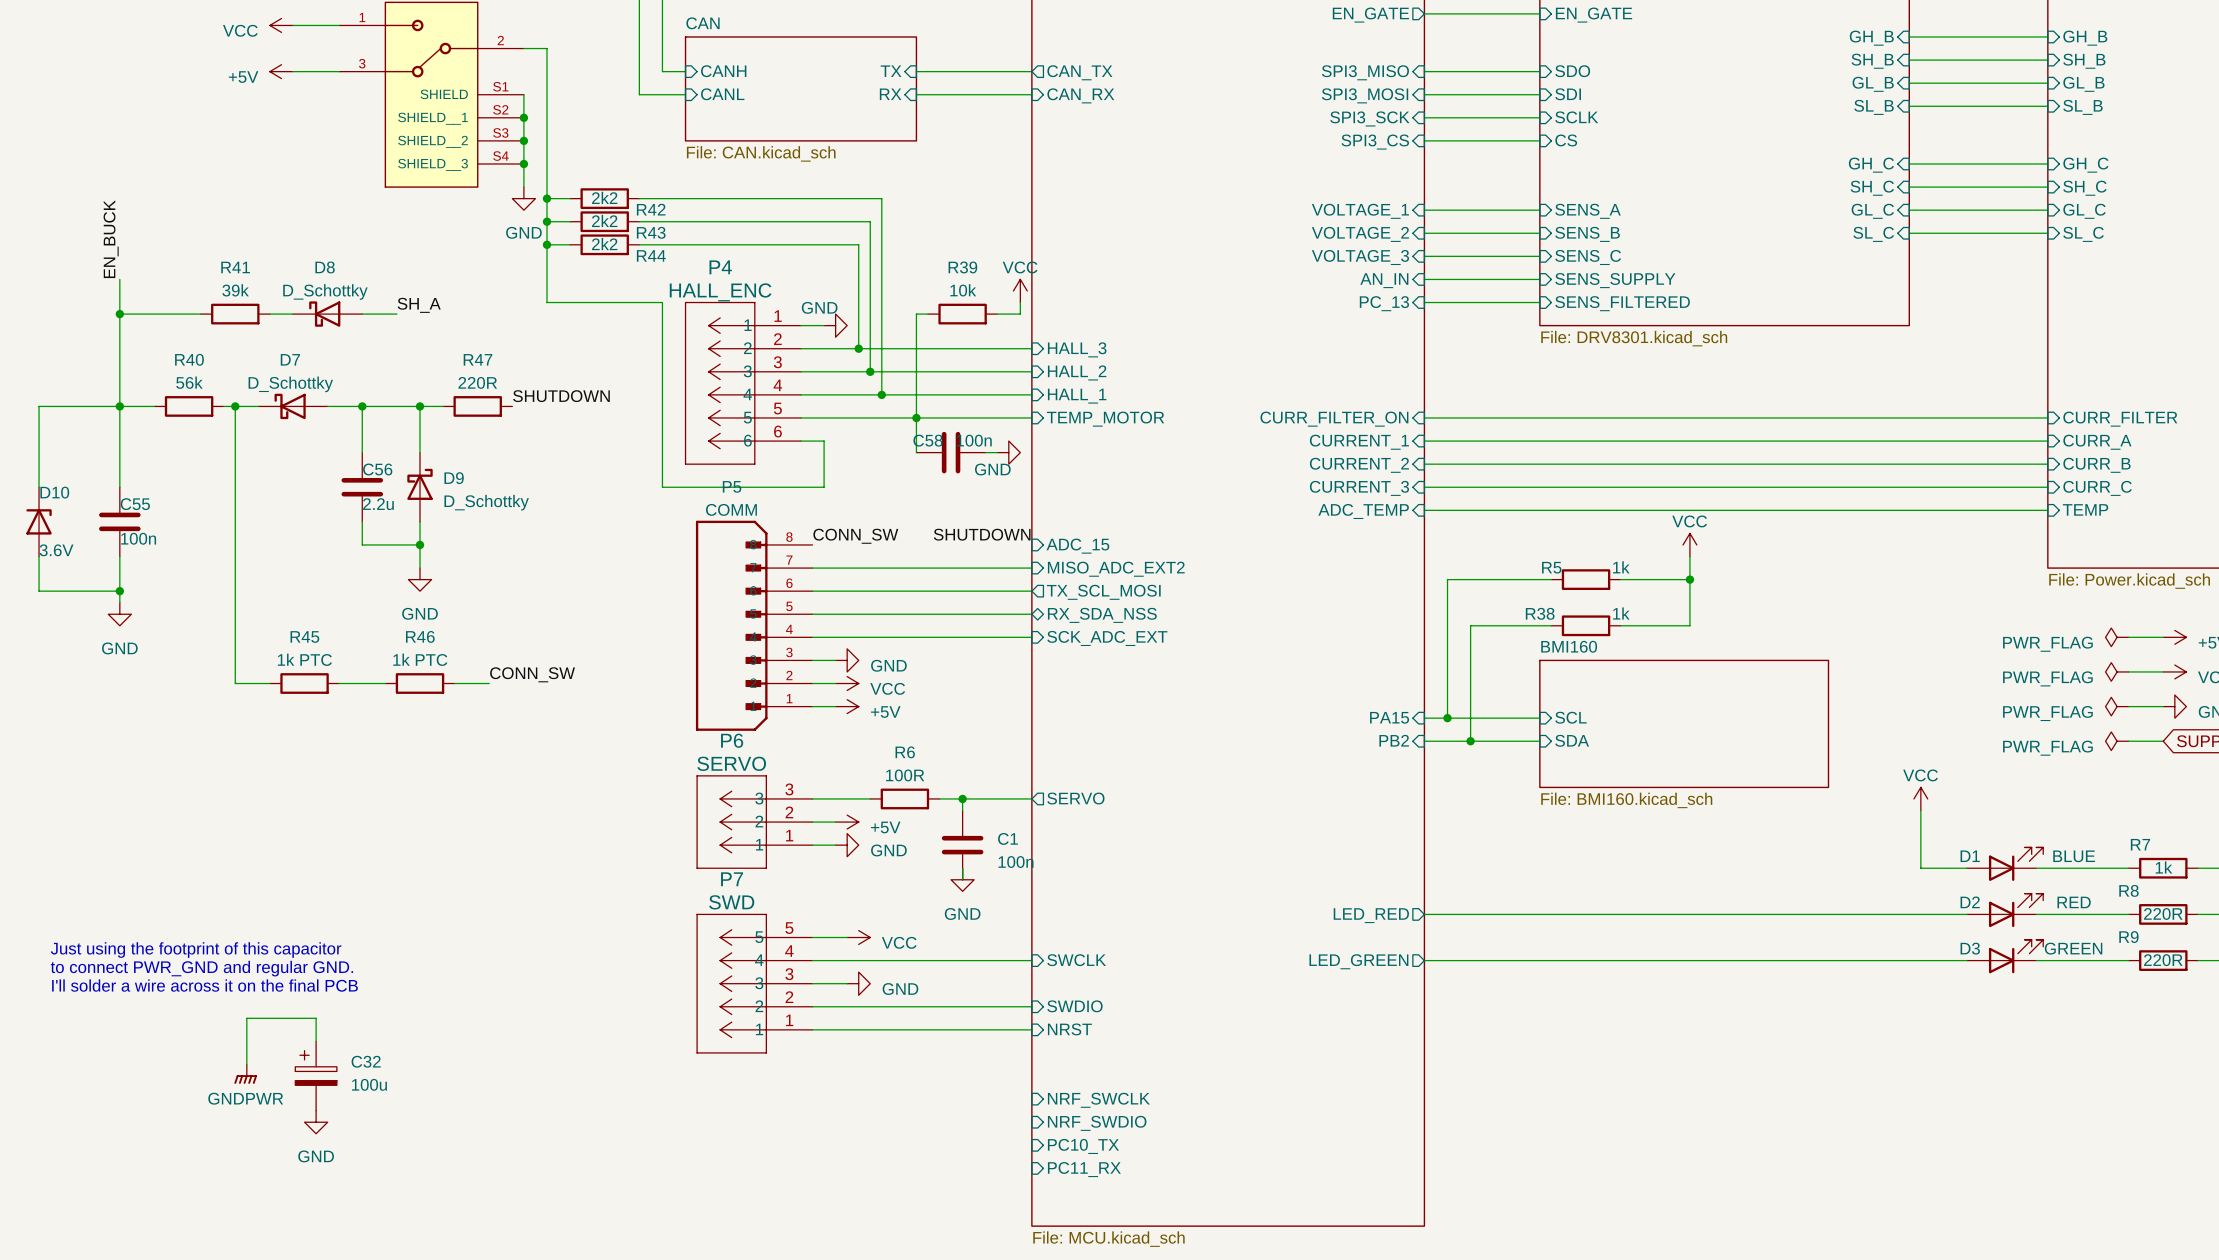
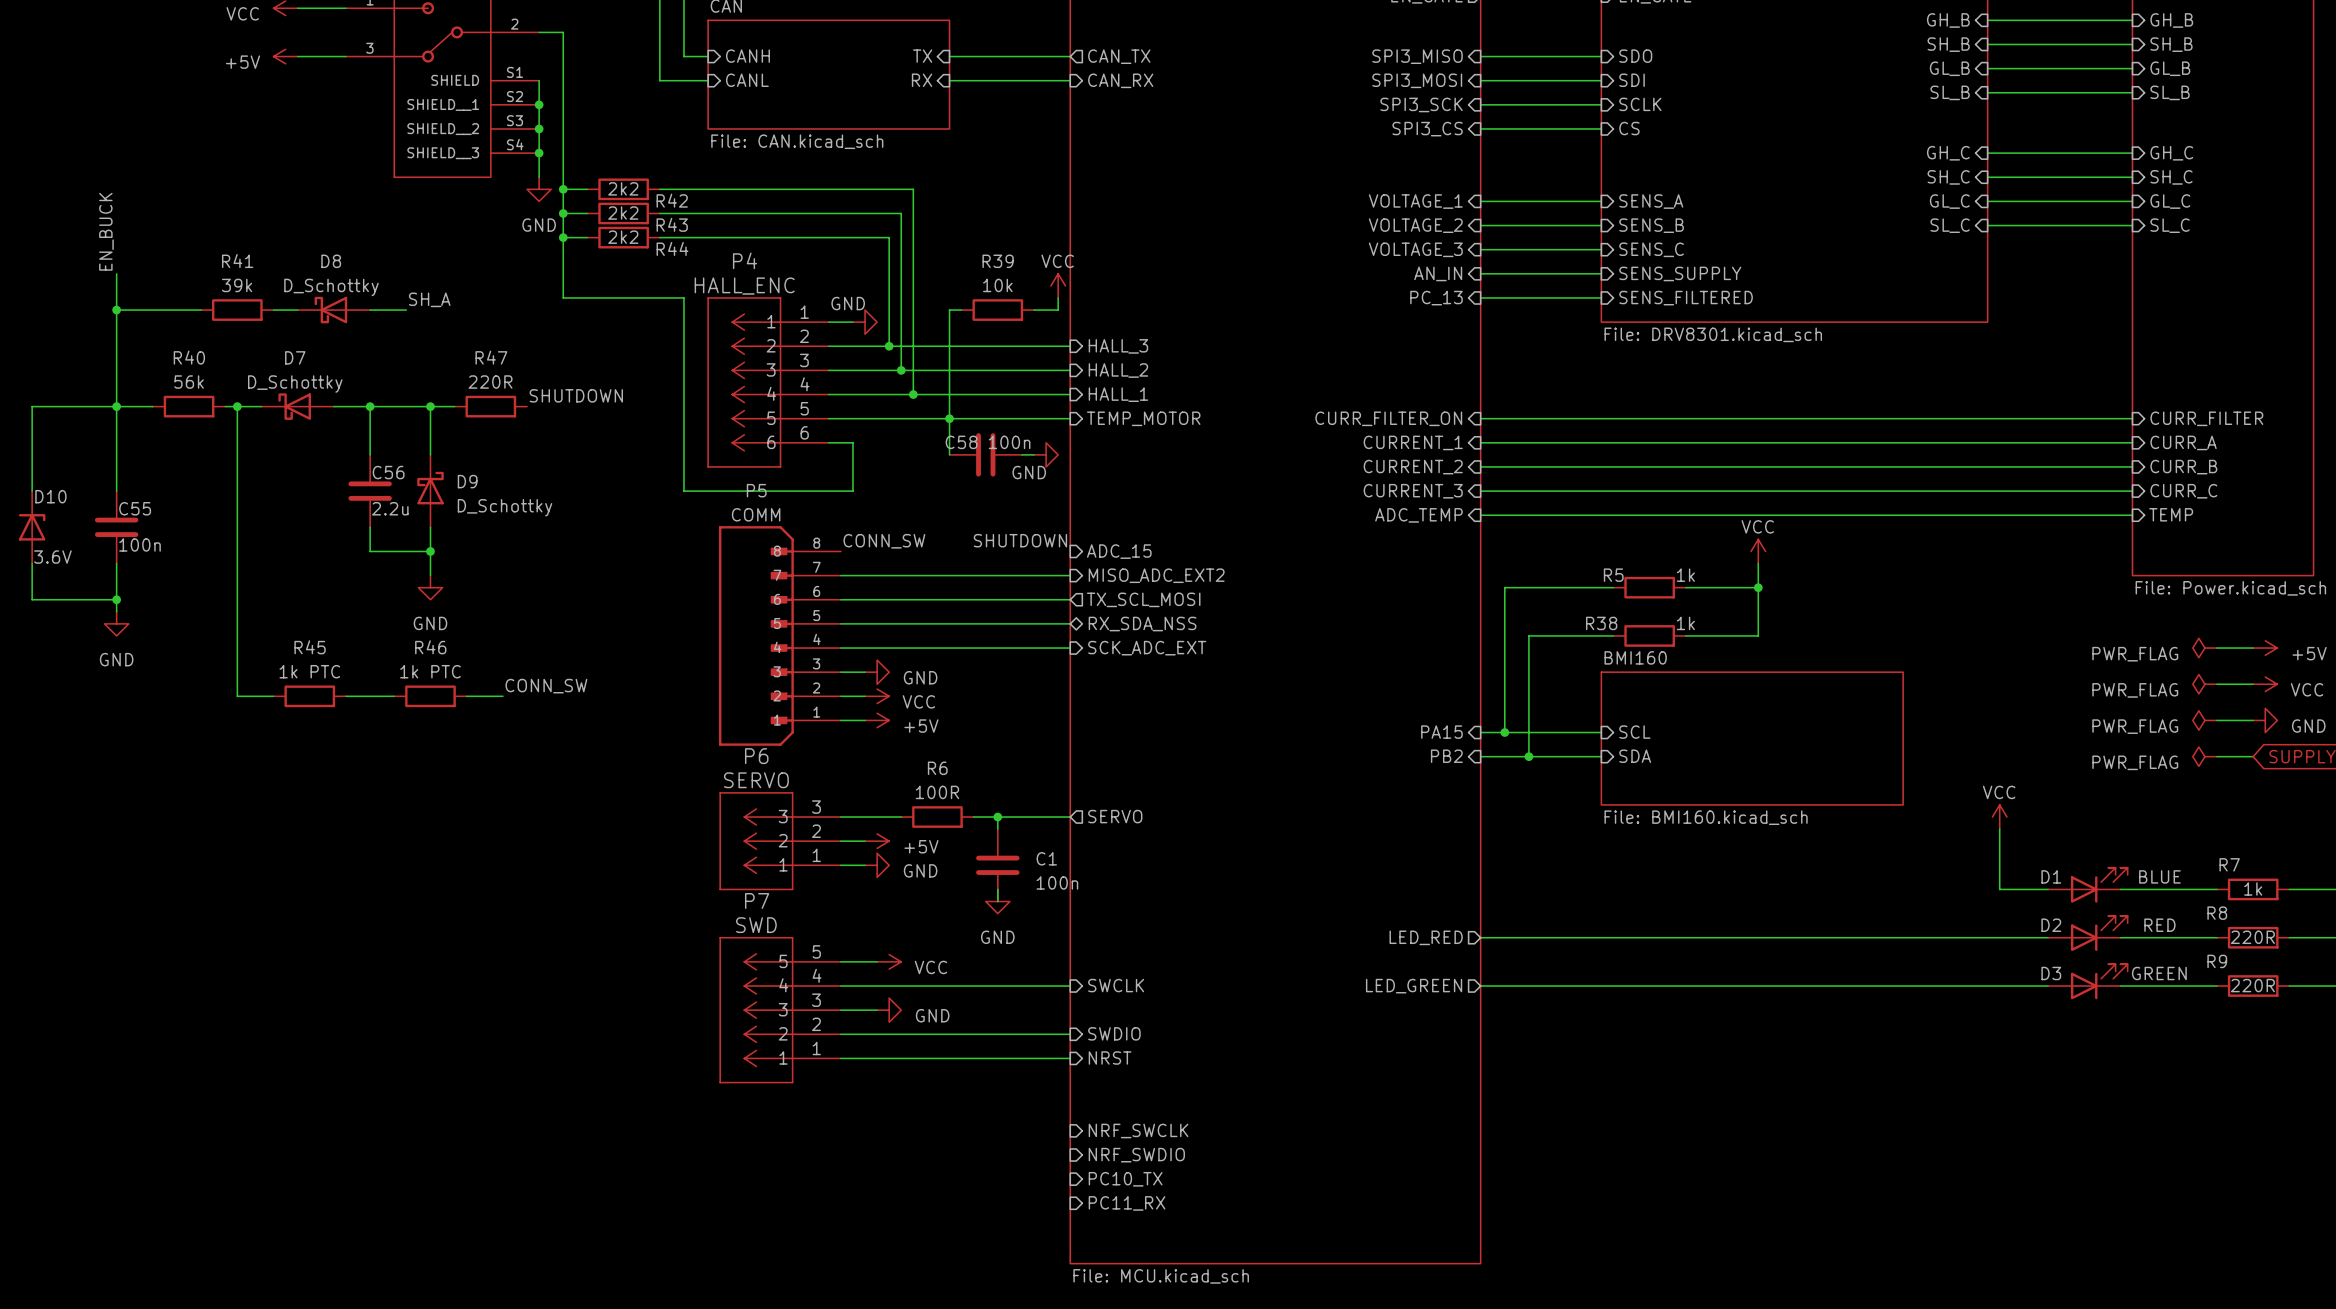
text: Just using the footprint of this capacitor (196, 950) -> none
text: to connect PWR_GND and regular GND. (201, 968) -> none
text: I'll solder a wire across it on the final PCB (204, 985) -> none
wire: (316, 1041) (316, 1018) (246, 1018) (246, 1064) -> none
power symbol: GNDPWR (245, 1074) -> none
C32: 100u (316, 1076) -> none
power symbol: GND (316, 1122) -> none

